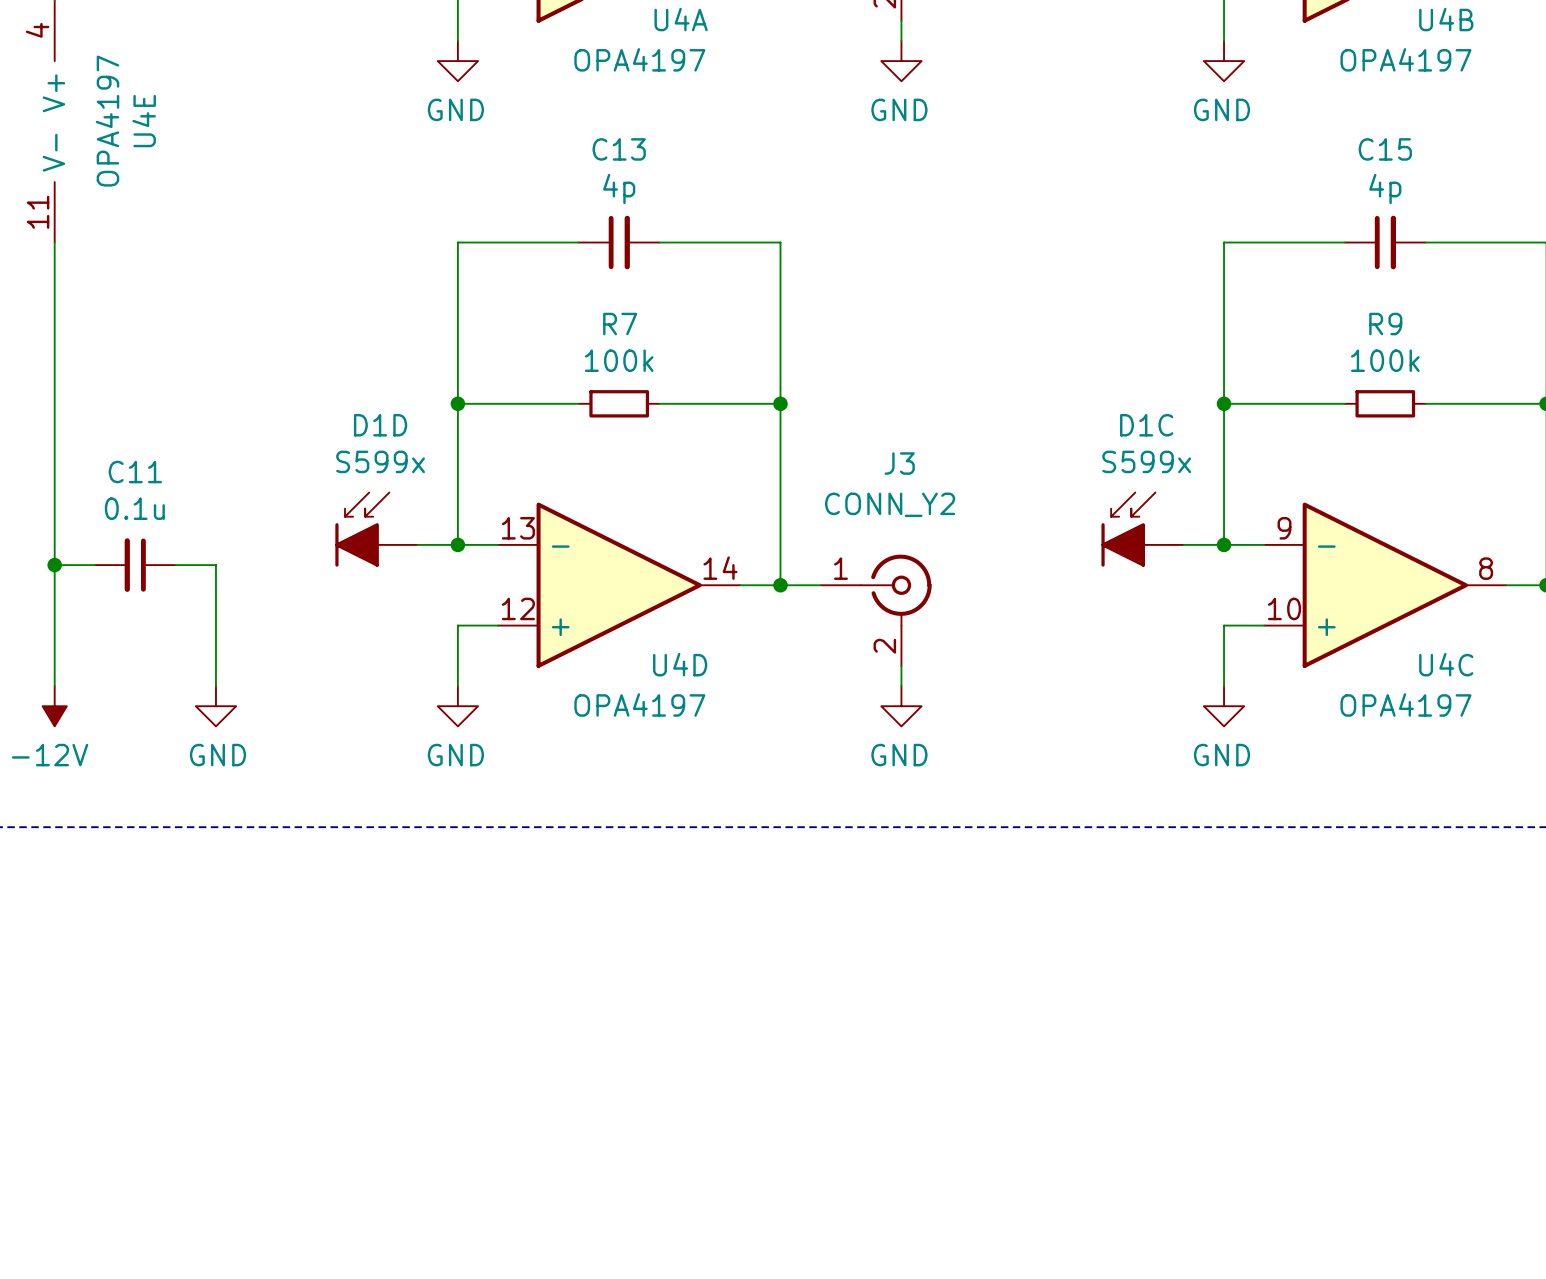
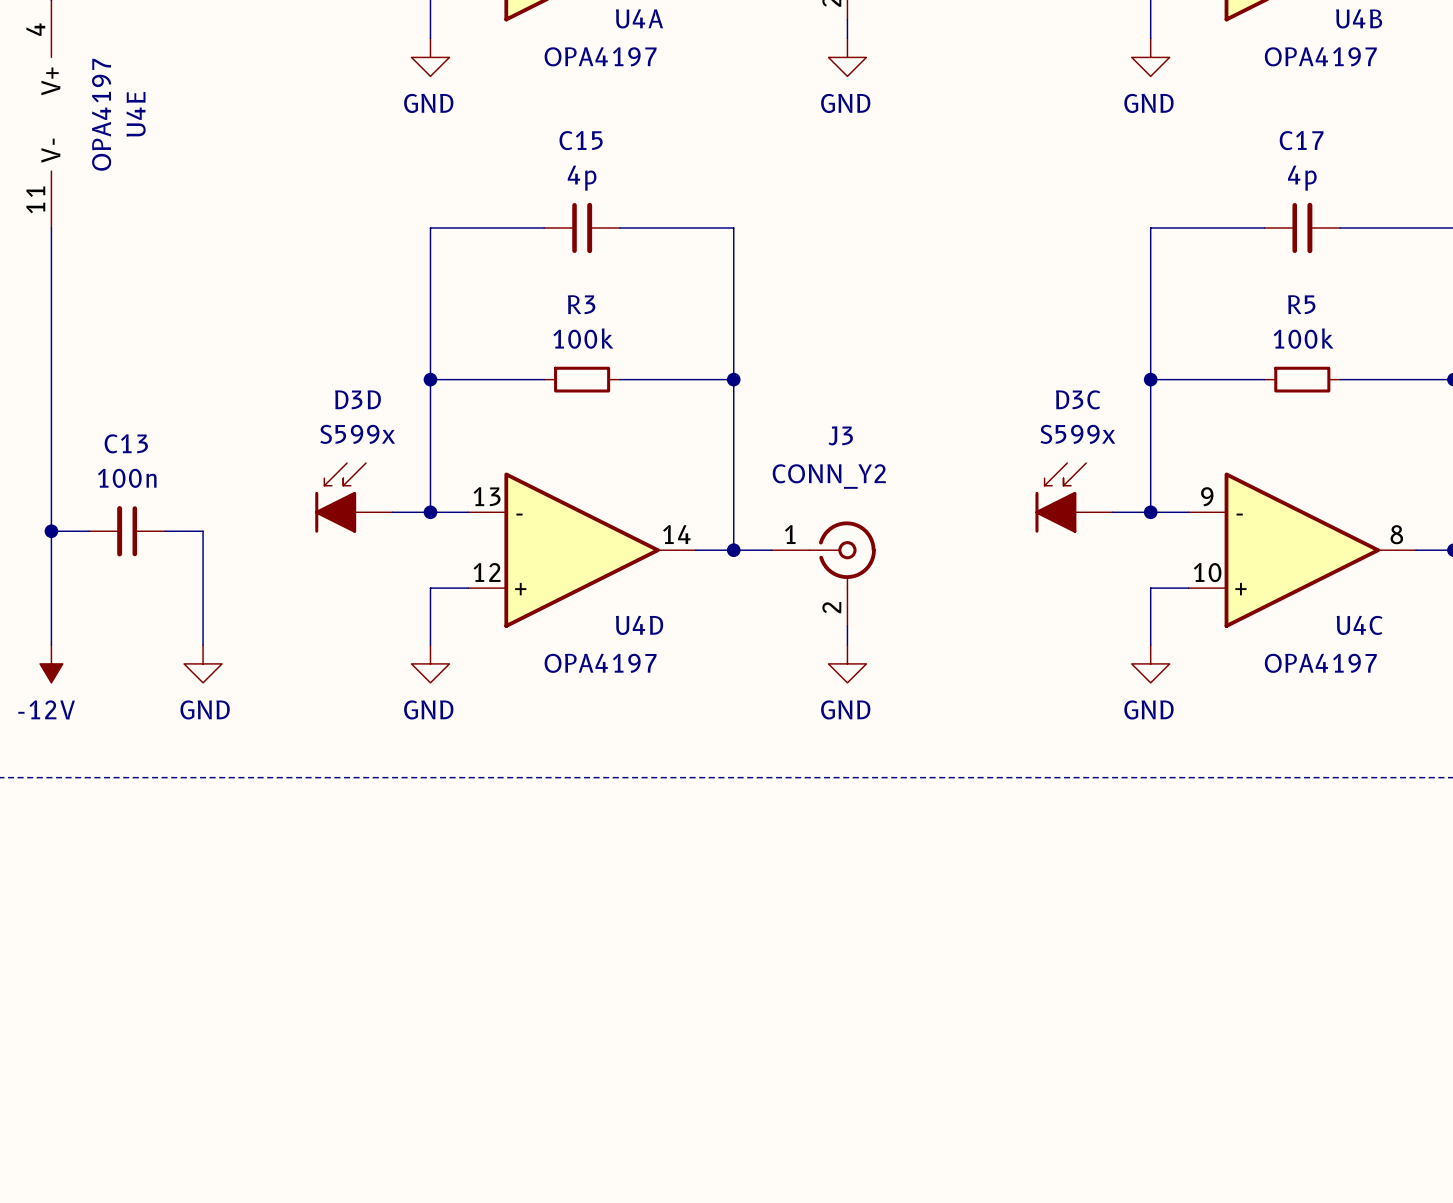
C13 name: C13 (619, 149) -> C15 (581, 140)
C15 name: C15 (1385, 149) -> C17 (1301, 140)
R7 name: R7 (620, 324) -> R3 (581, 304)
R9 name: R9 (1385, 324) -> R5 (1301, 304)
D1D name: D1D (380, 425) -> D3D (358, 399)
D1C name: D1C (1146, 425) -> D3C (1078, 399)
C11 name: C11 (135, 472) -> C13 (126, 443)
C11 value: 0.1u (134, 508) -> 100n (127, 478)

